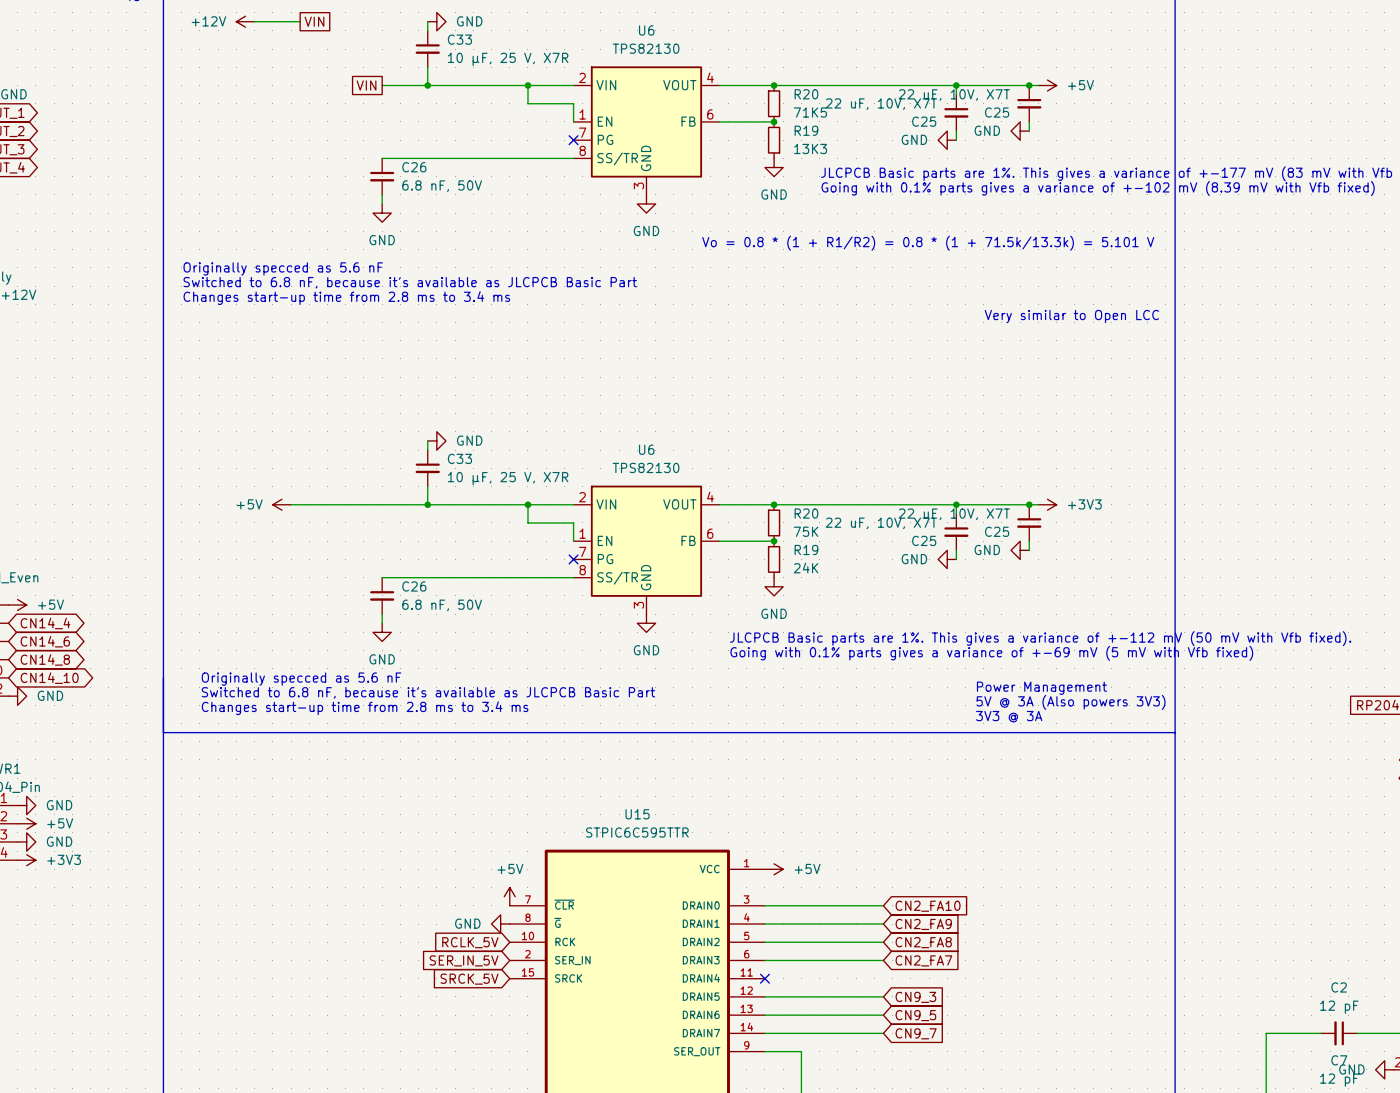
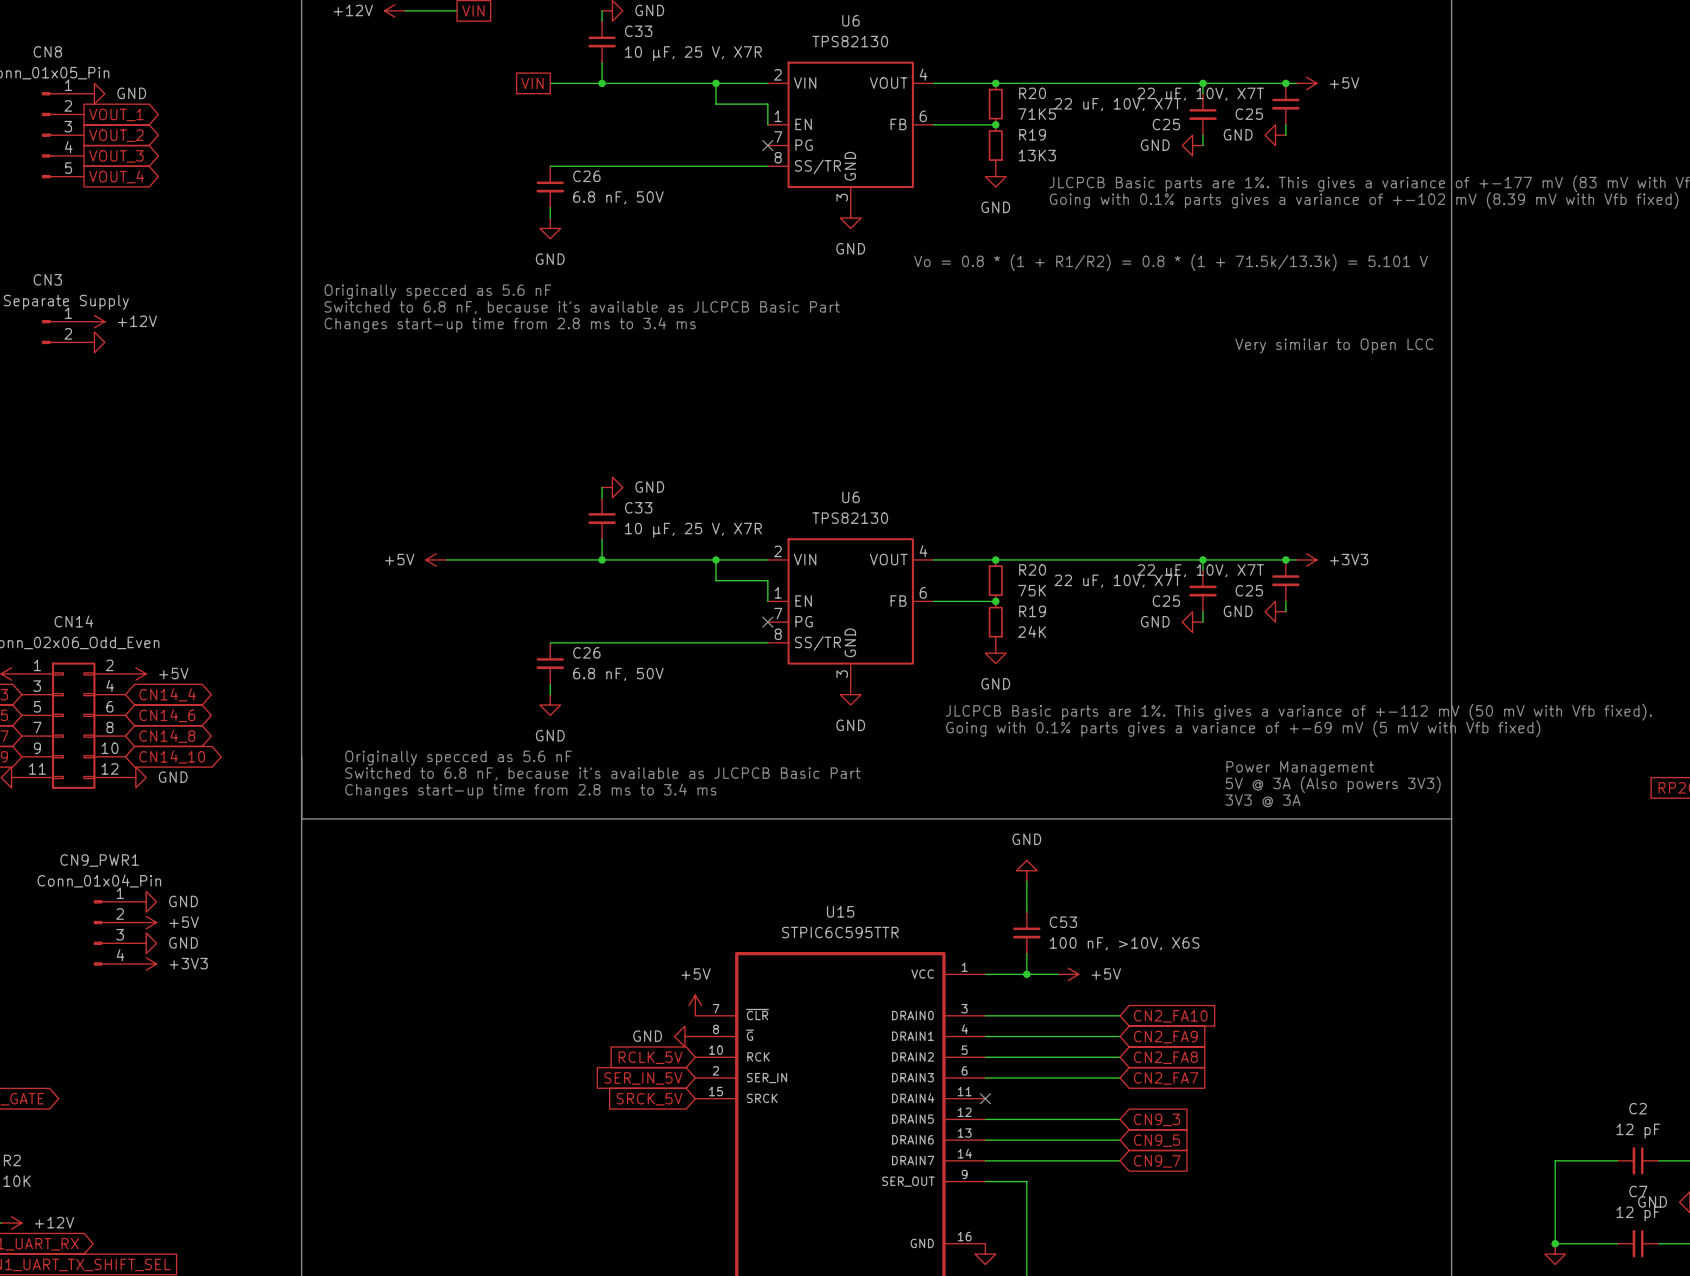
power symbol: none -> GND (1026, 870)
wire: none -> (1026, 881) (1026, 912)
C53: none -> 100 nF, >10V, X6S (1026, 932)
wire: none -> (1026, 953) (1026, 974)
wire: none -> (985, 974) (1057, 974)
power symbol position: +5V (774, 869) -> +5V (1068, 974)
junction: none -> (1026, 974)

